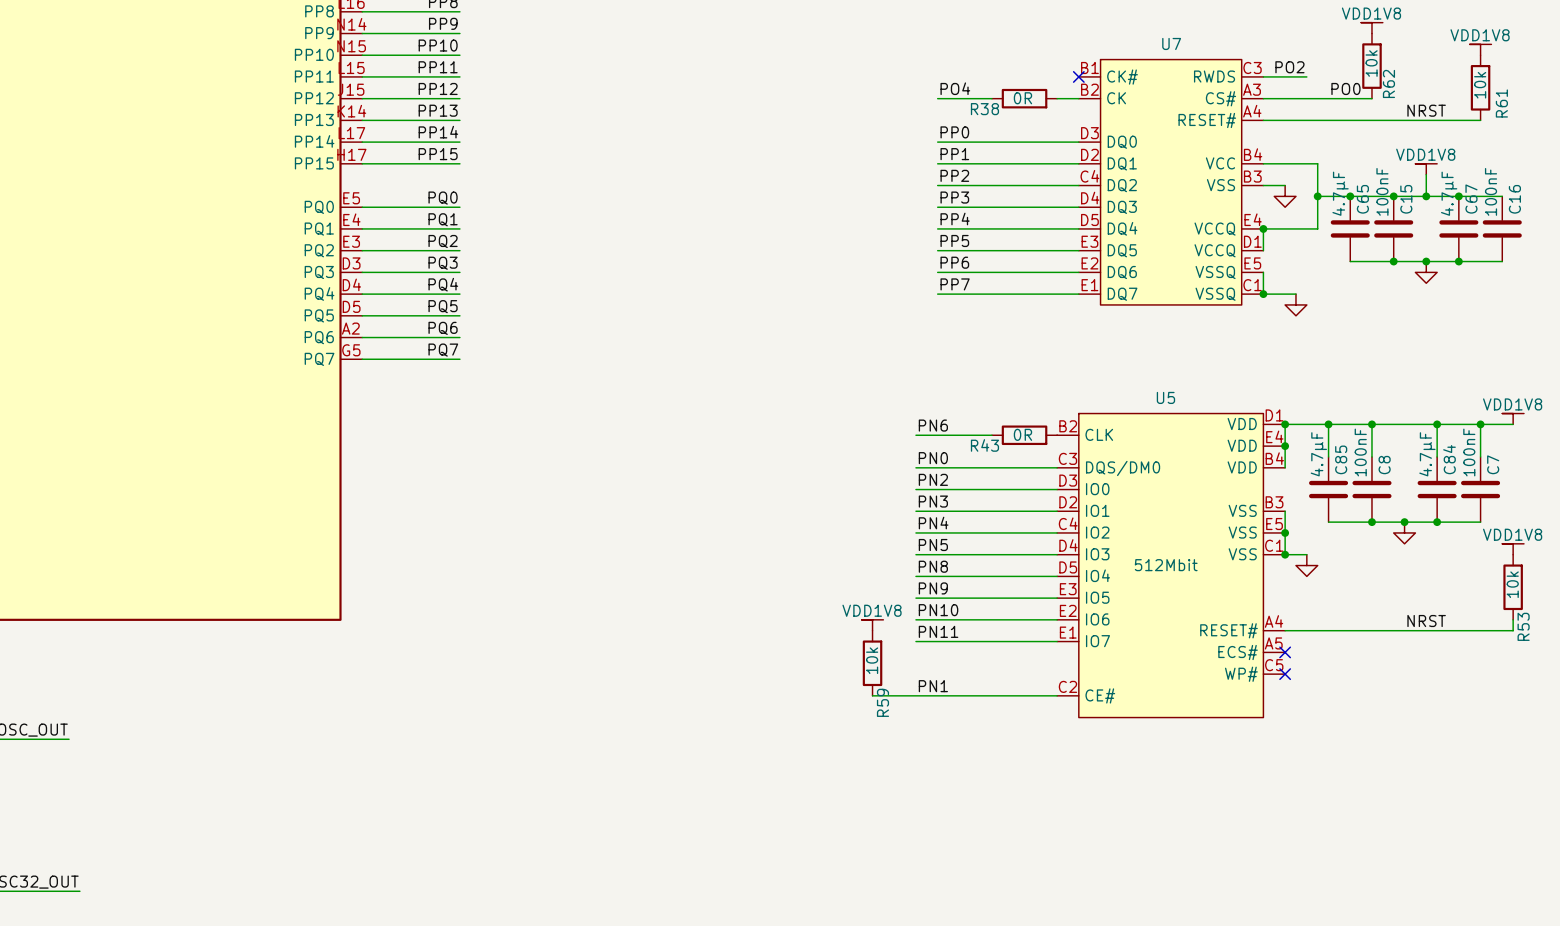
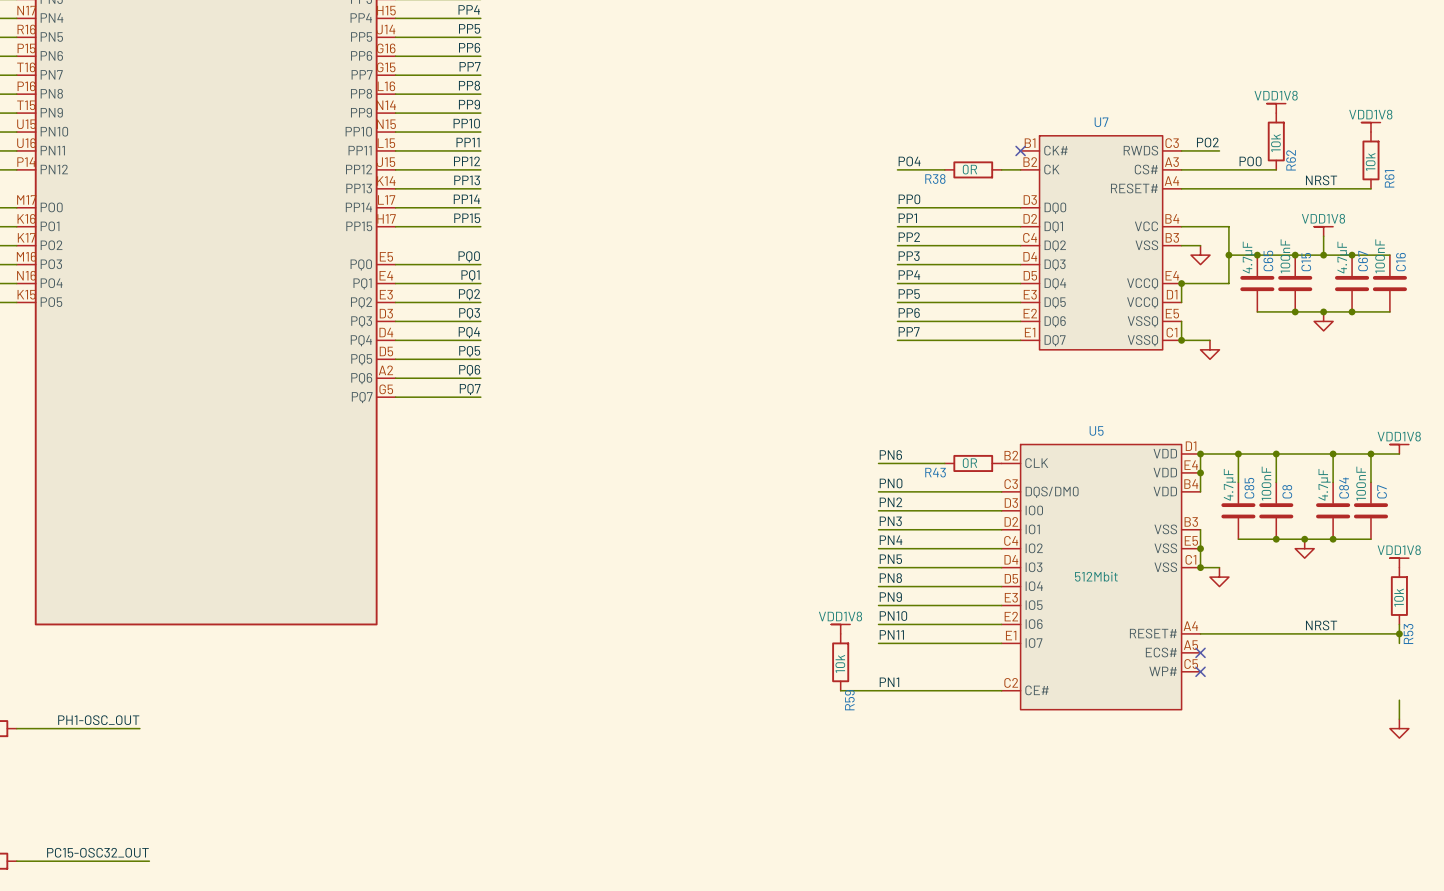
wire: none -> (1399, 633) (1399, 643)
junction: none -> (1399, 633)
wire: none -> (1399, 700) (1399, 719)
power symbol: none -> (1399, 728)

